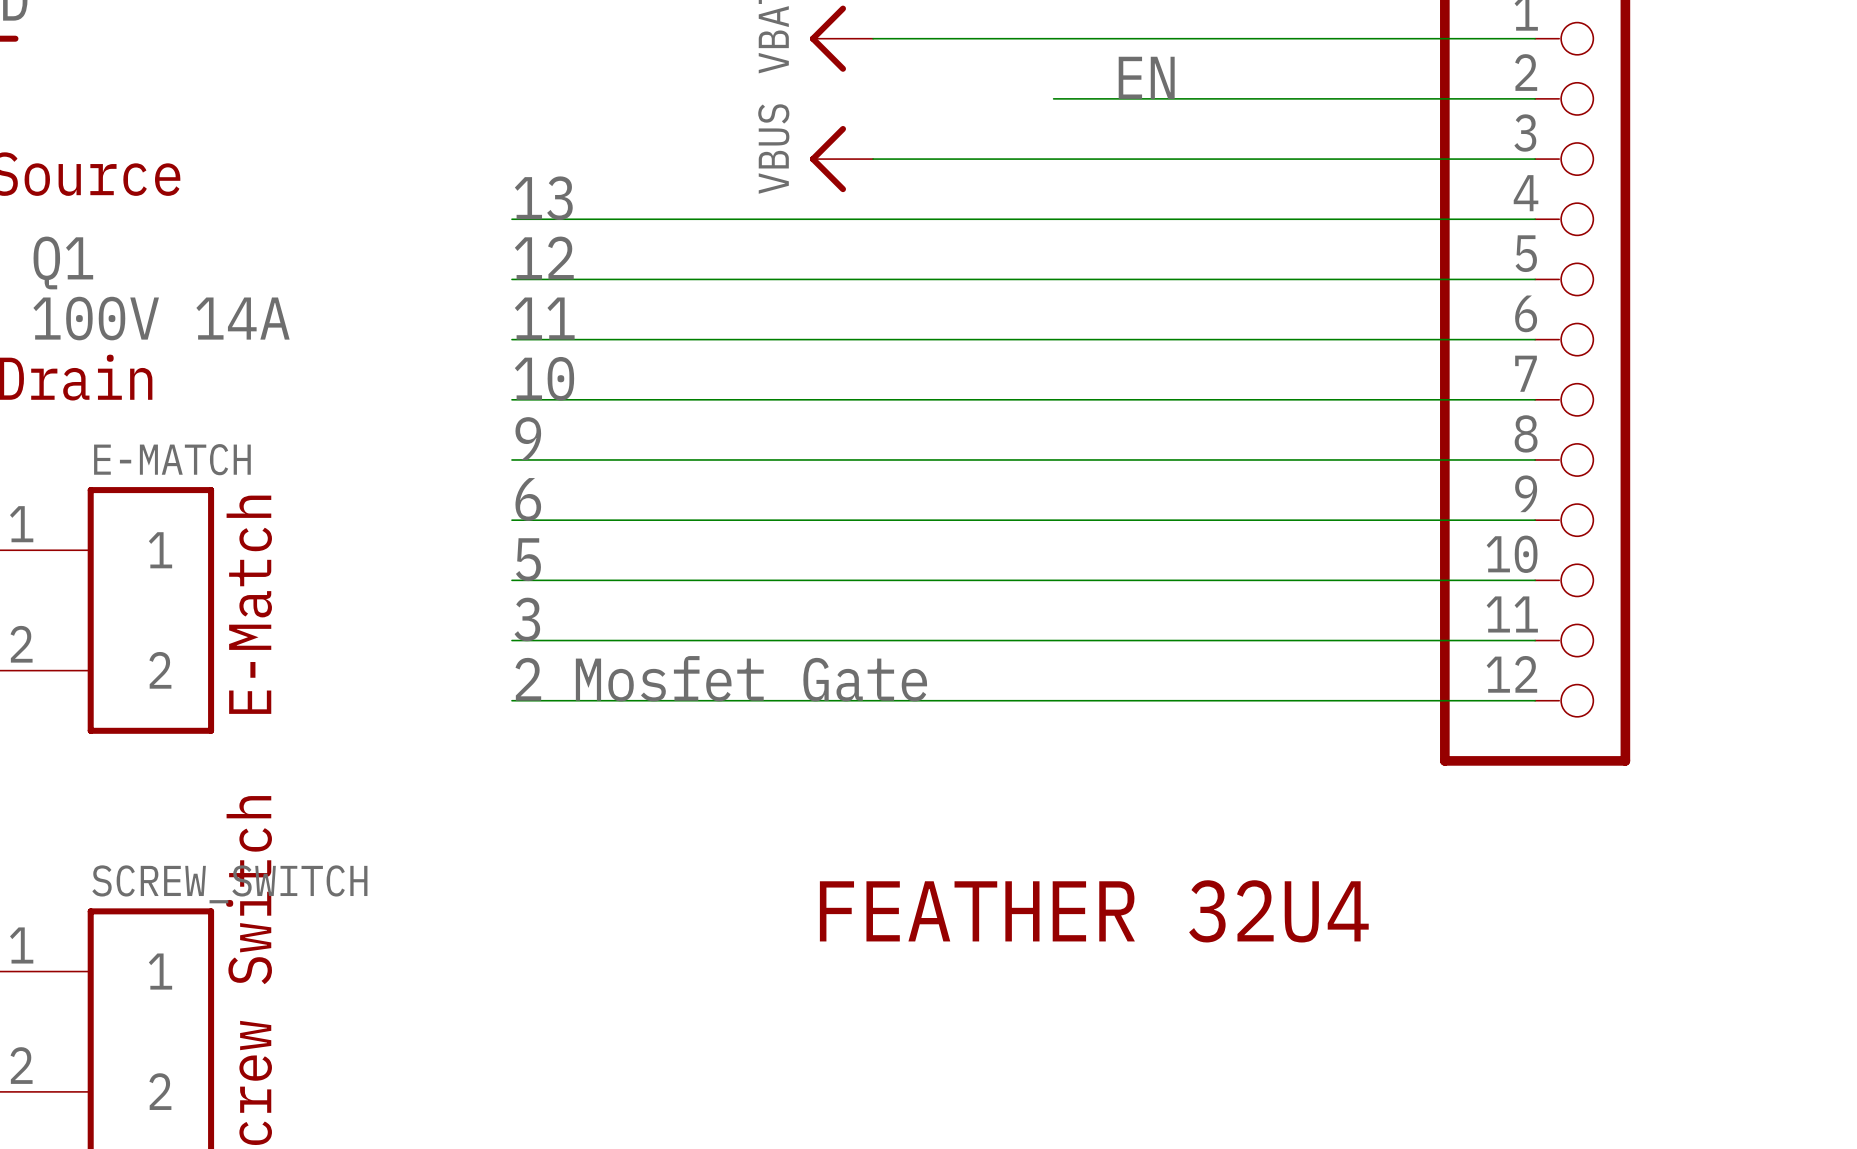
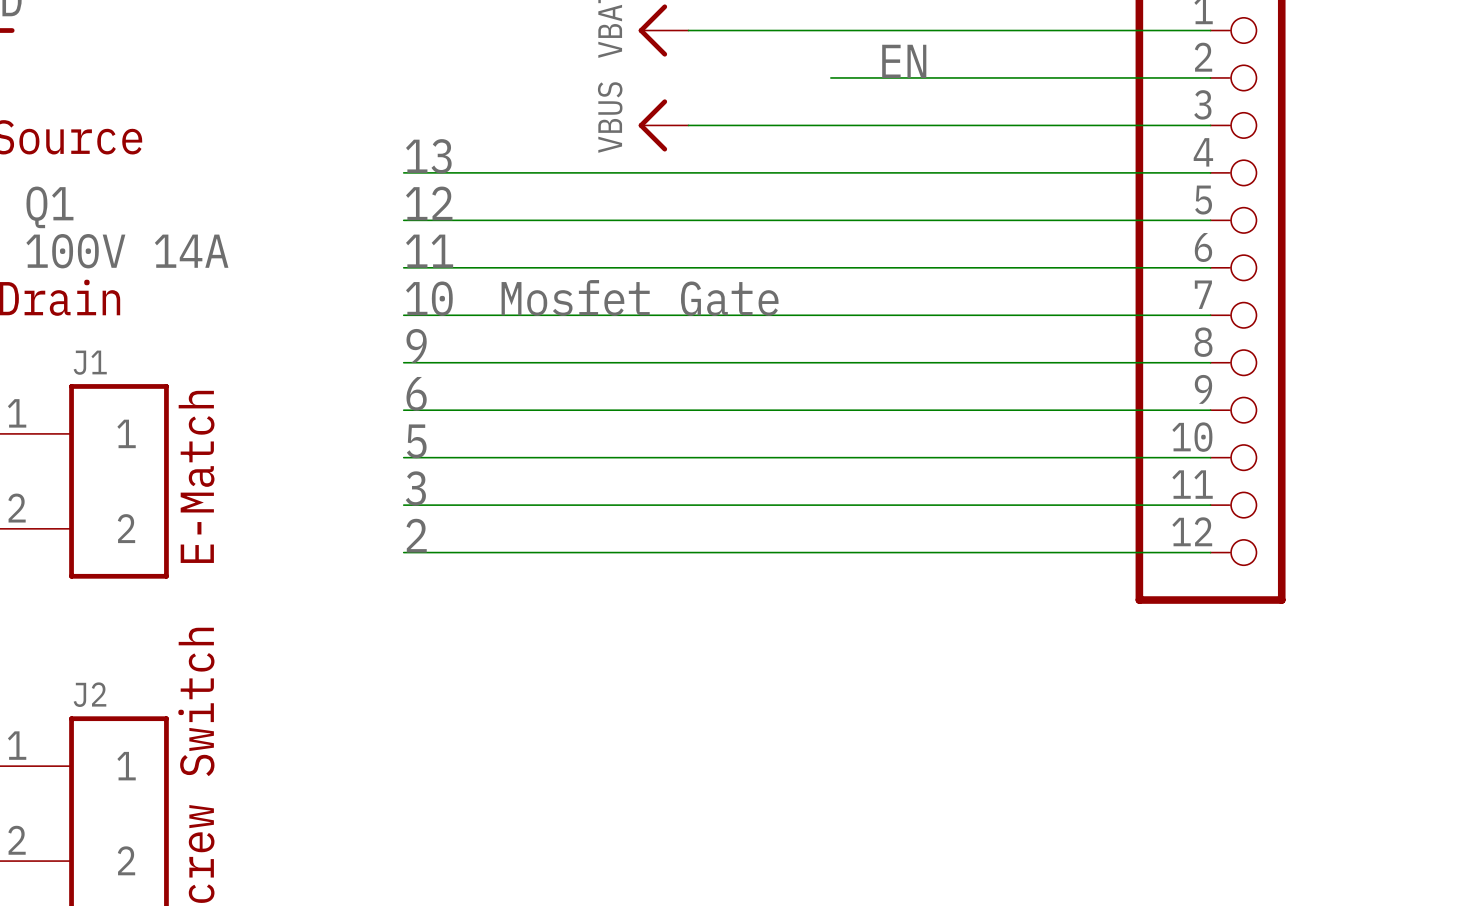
E-MATCH name: E-MATCH (172, 459) -> J1 (90, 362)
text position: Mosfet Gate (751, 678) -> Mosfet Gate (640, 297)
SCREW_SWITCH name: SCREW_SWITCH (229, 884) -> J2 (89, 694)
text: FEATHER 32U4 (1094, 911) -> none

